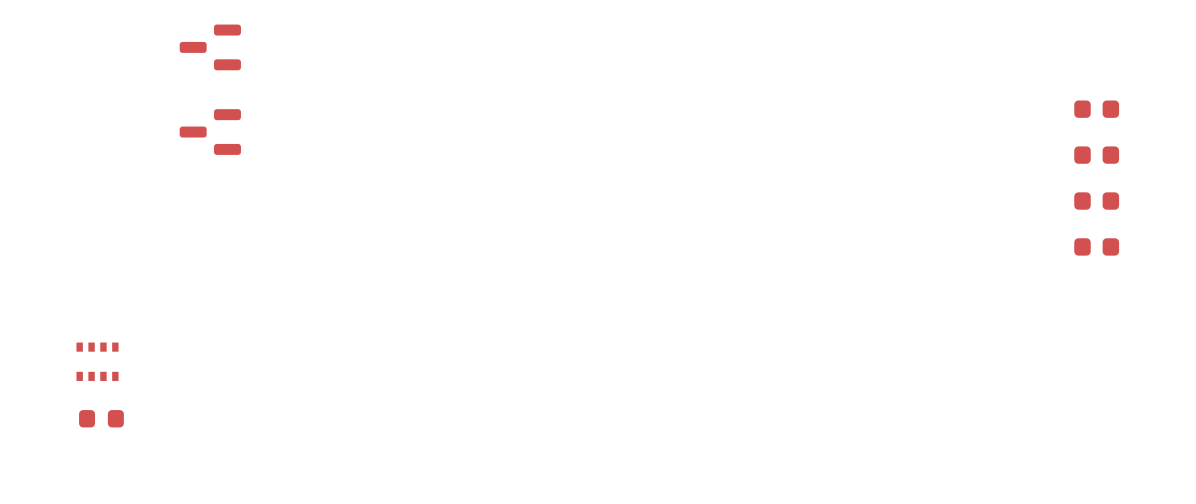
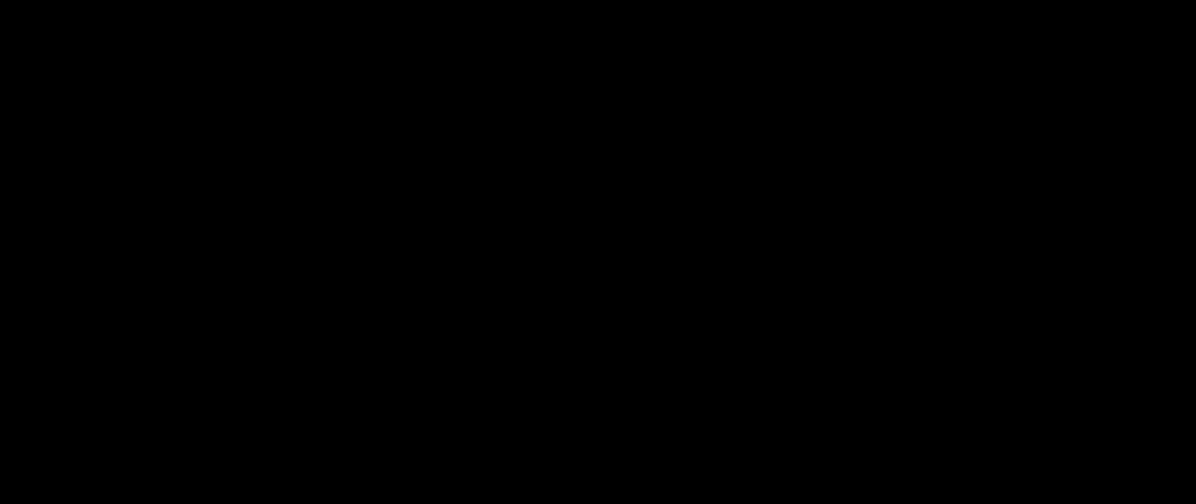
part: (210, 47) -> none
part: (1096, 109) -> none
part: (210, 132) -> none
part: (1096, 155) -> none
part: (1096, 201) -> none
part: (1096, 246) -> none
part: (97, 361) -> none
part: (101, 418) -> none

